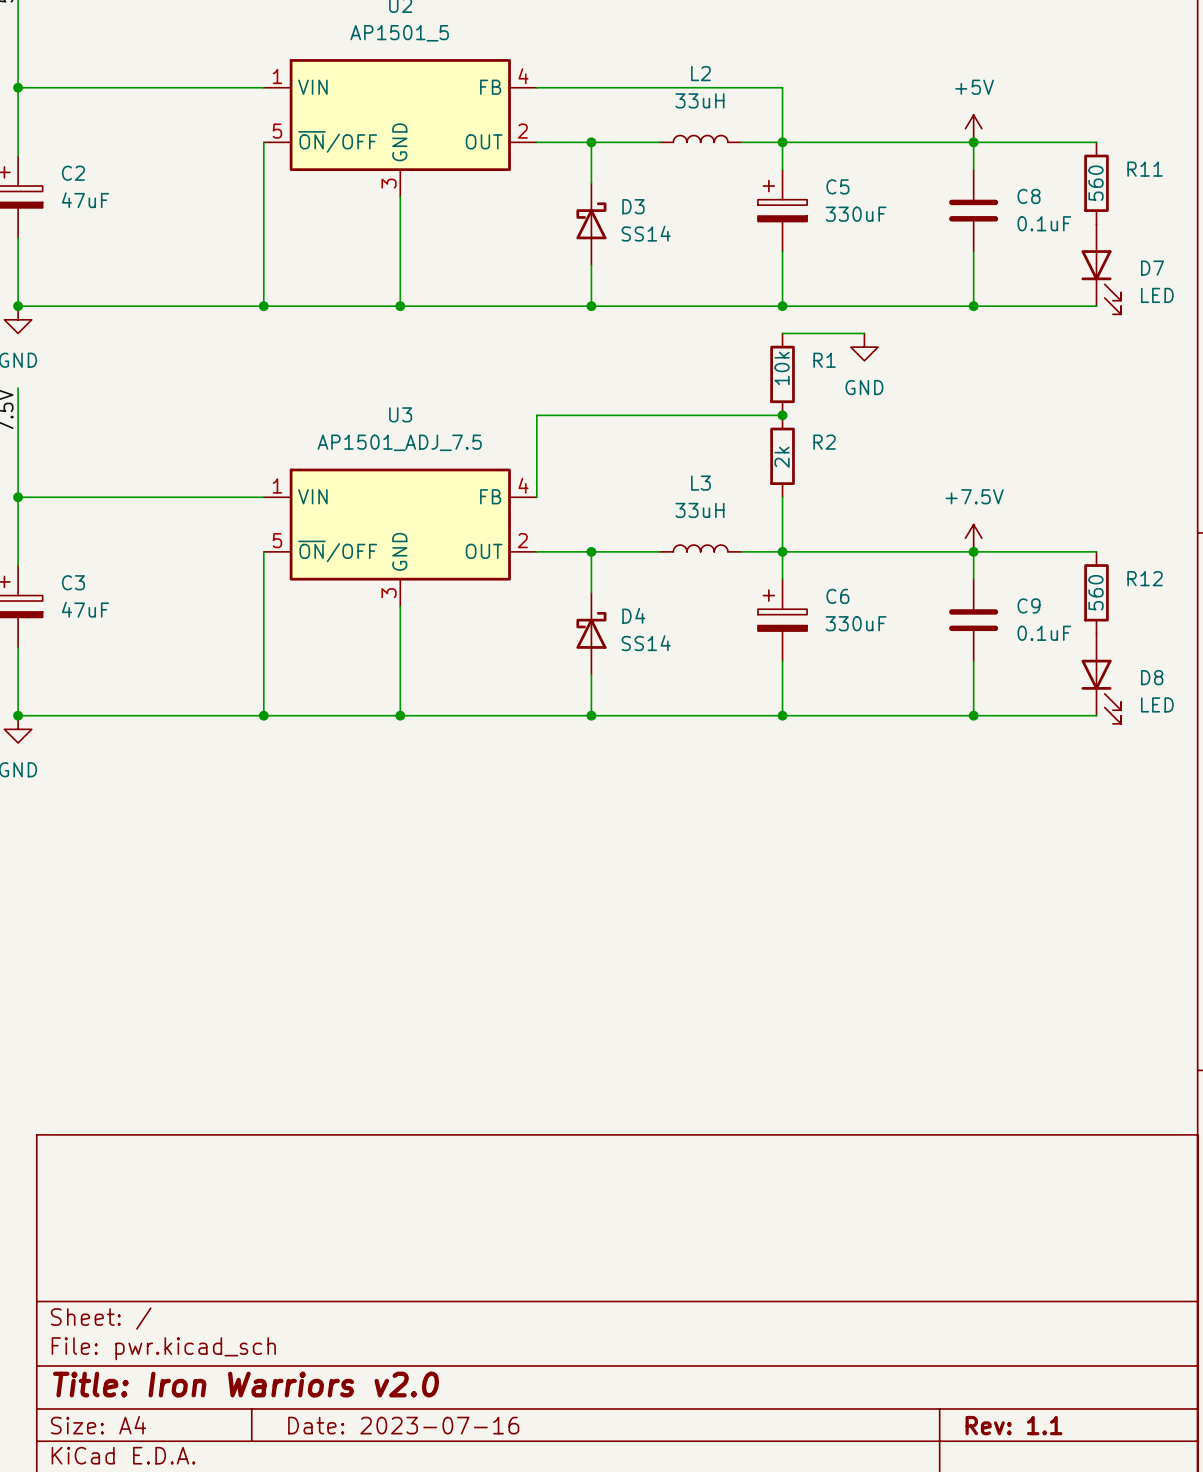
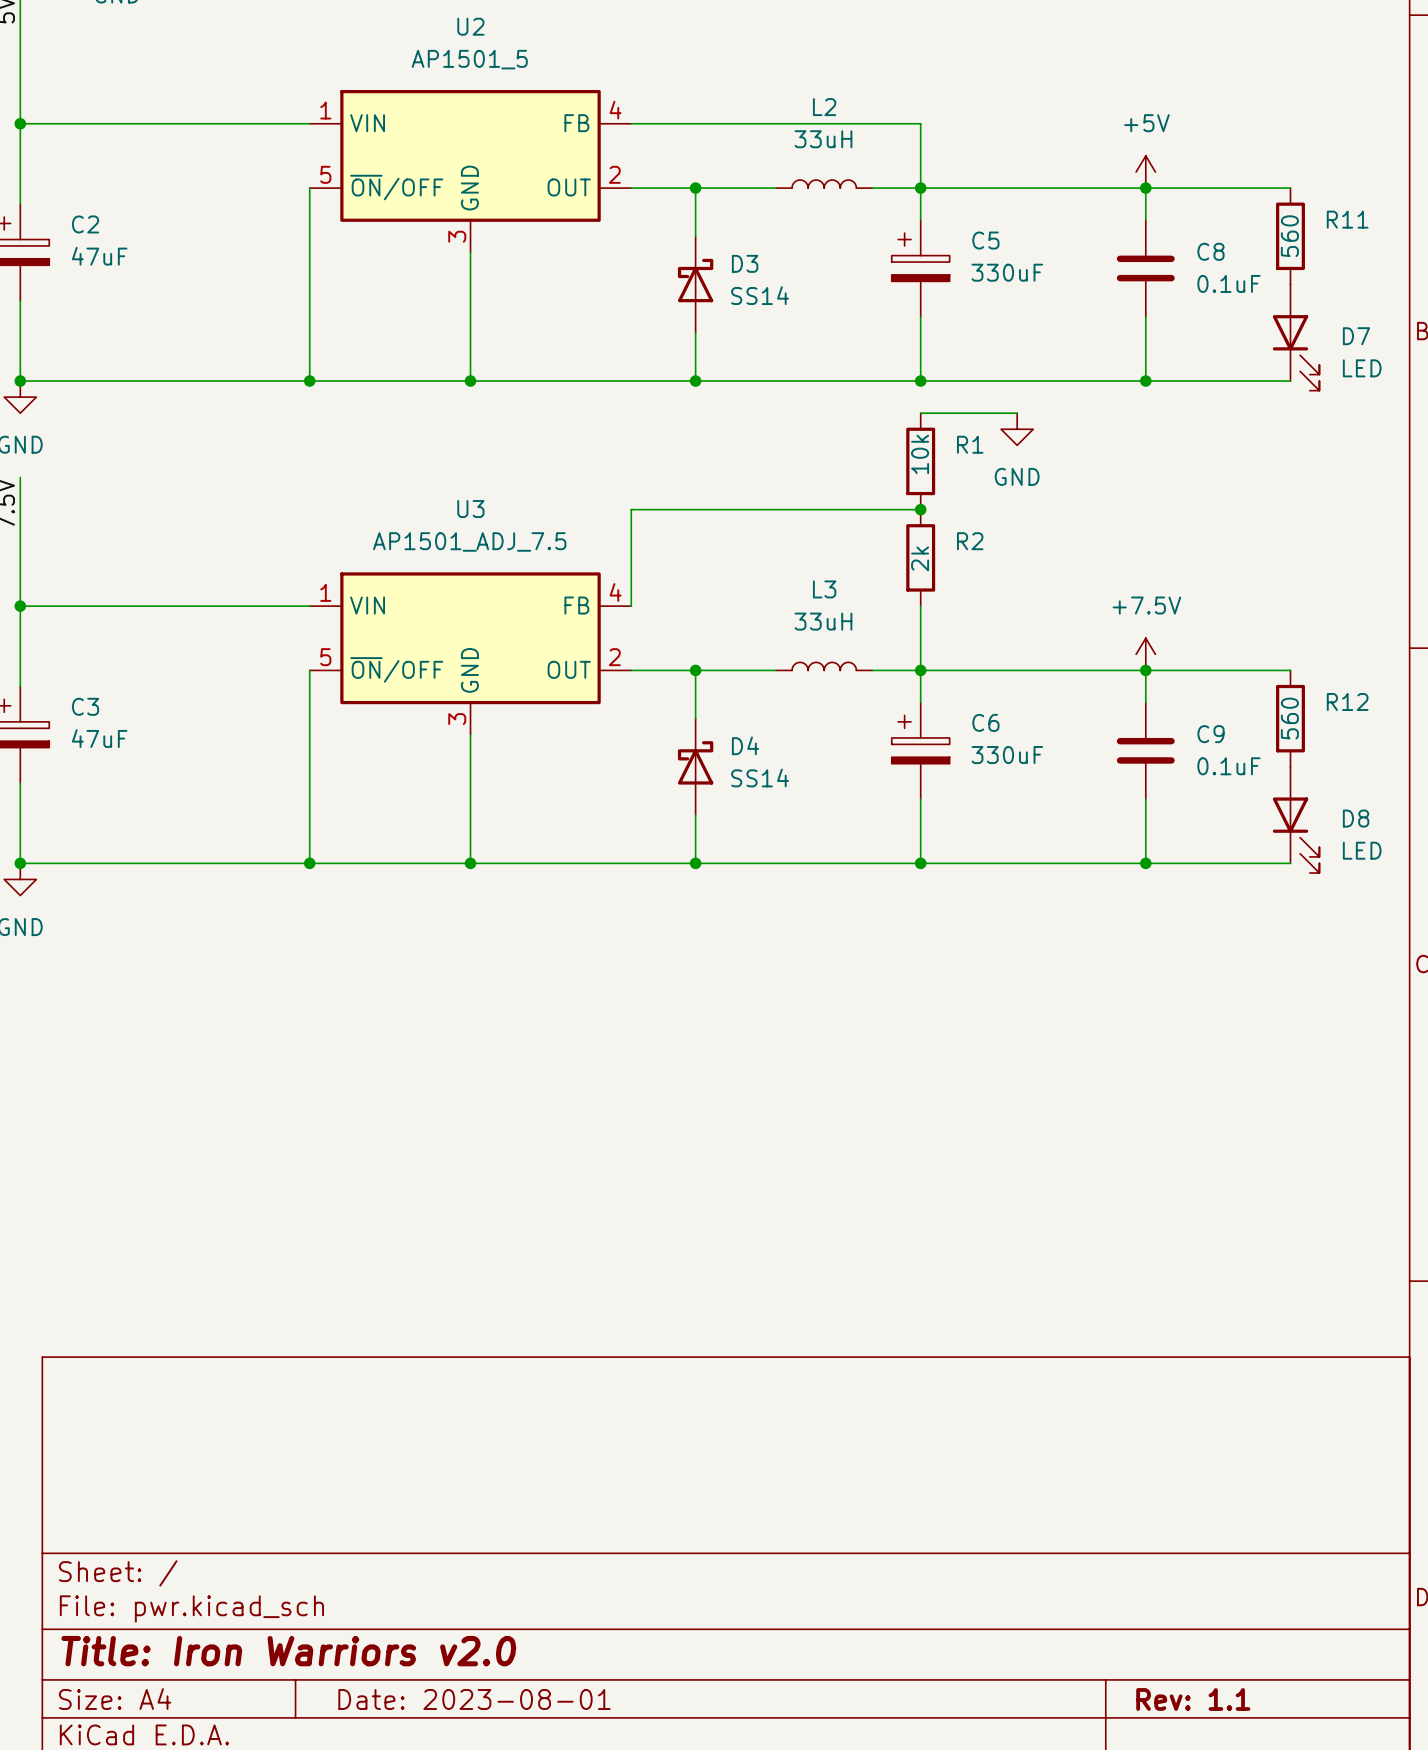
title block: Date: 2023-07-16 (403, 1425) -> Date: 2023-08-01 (474, 1699)

